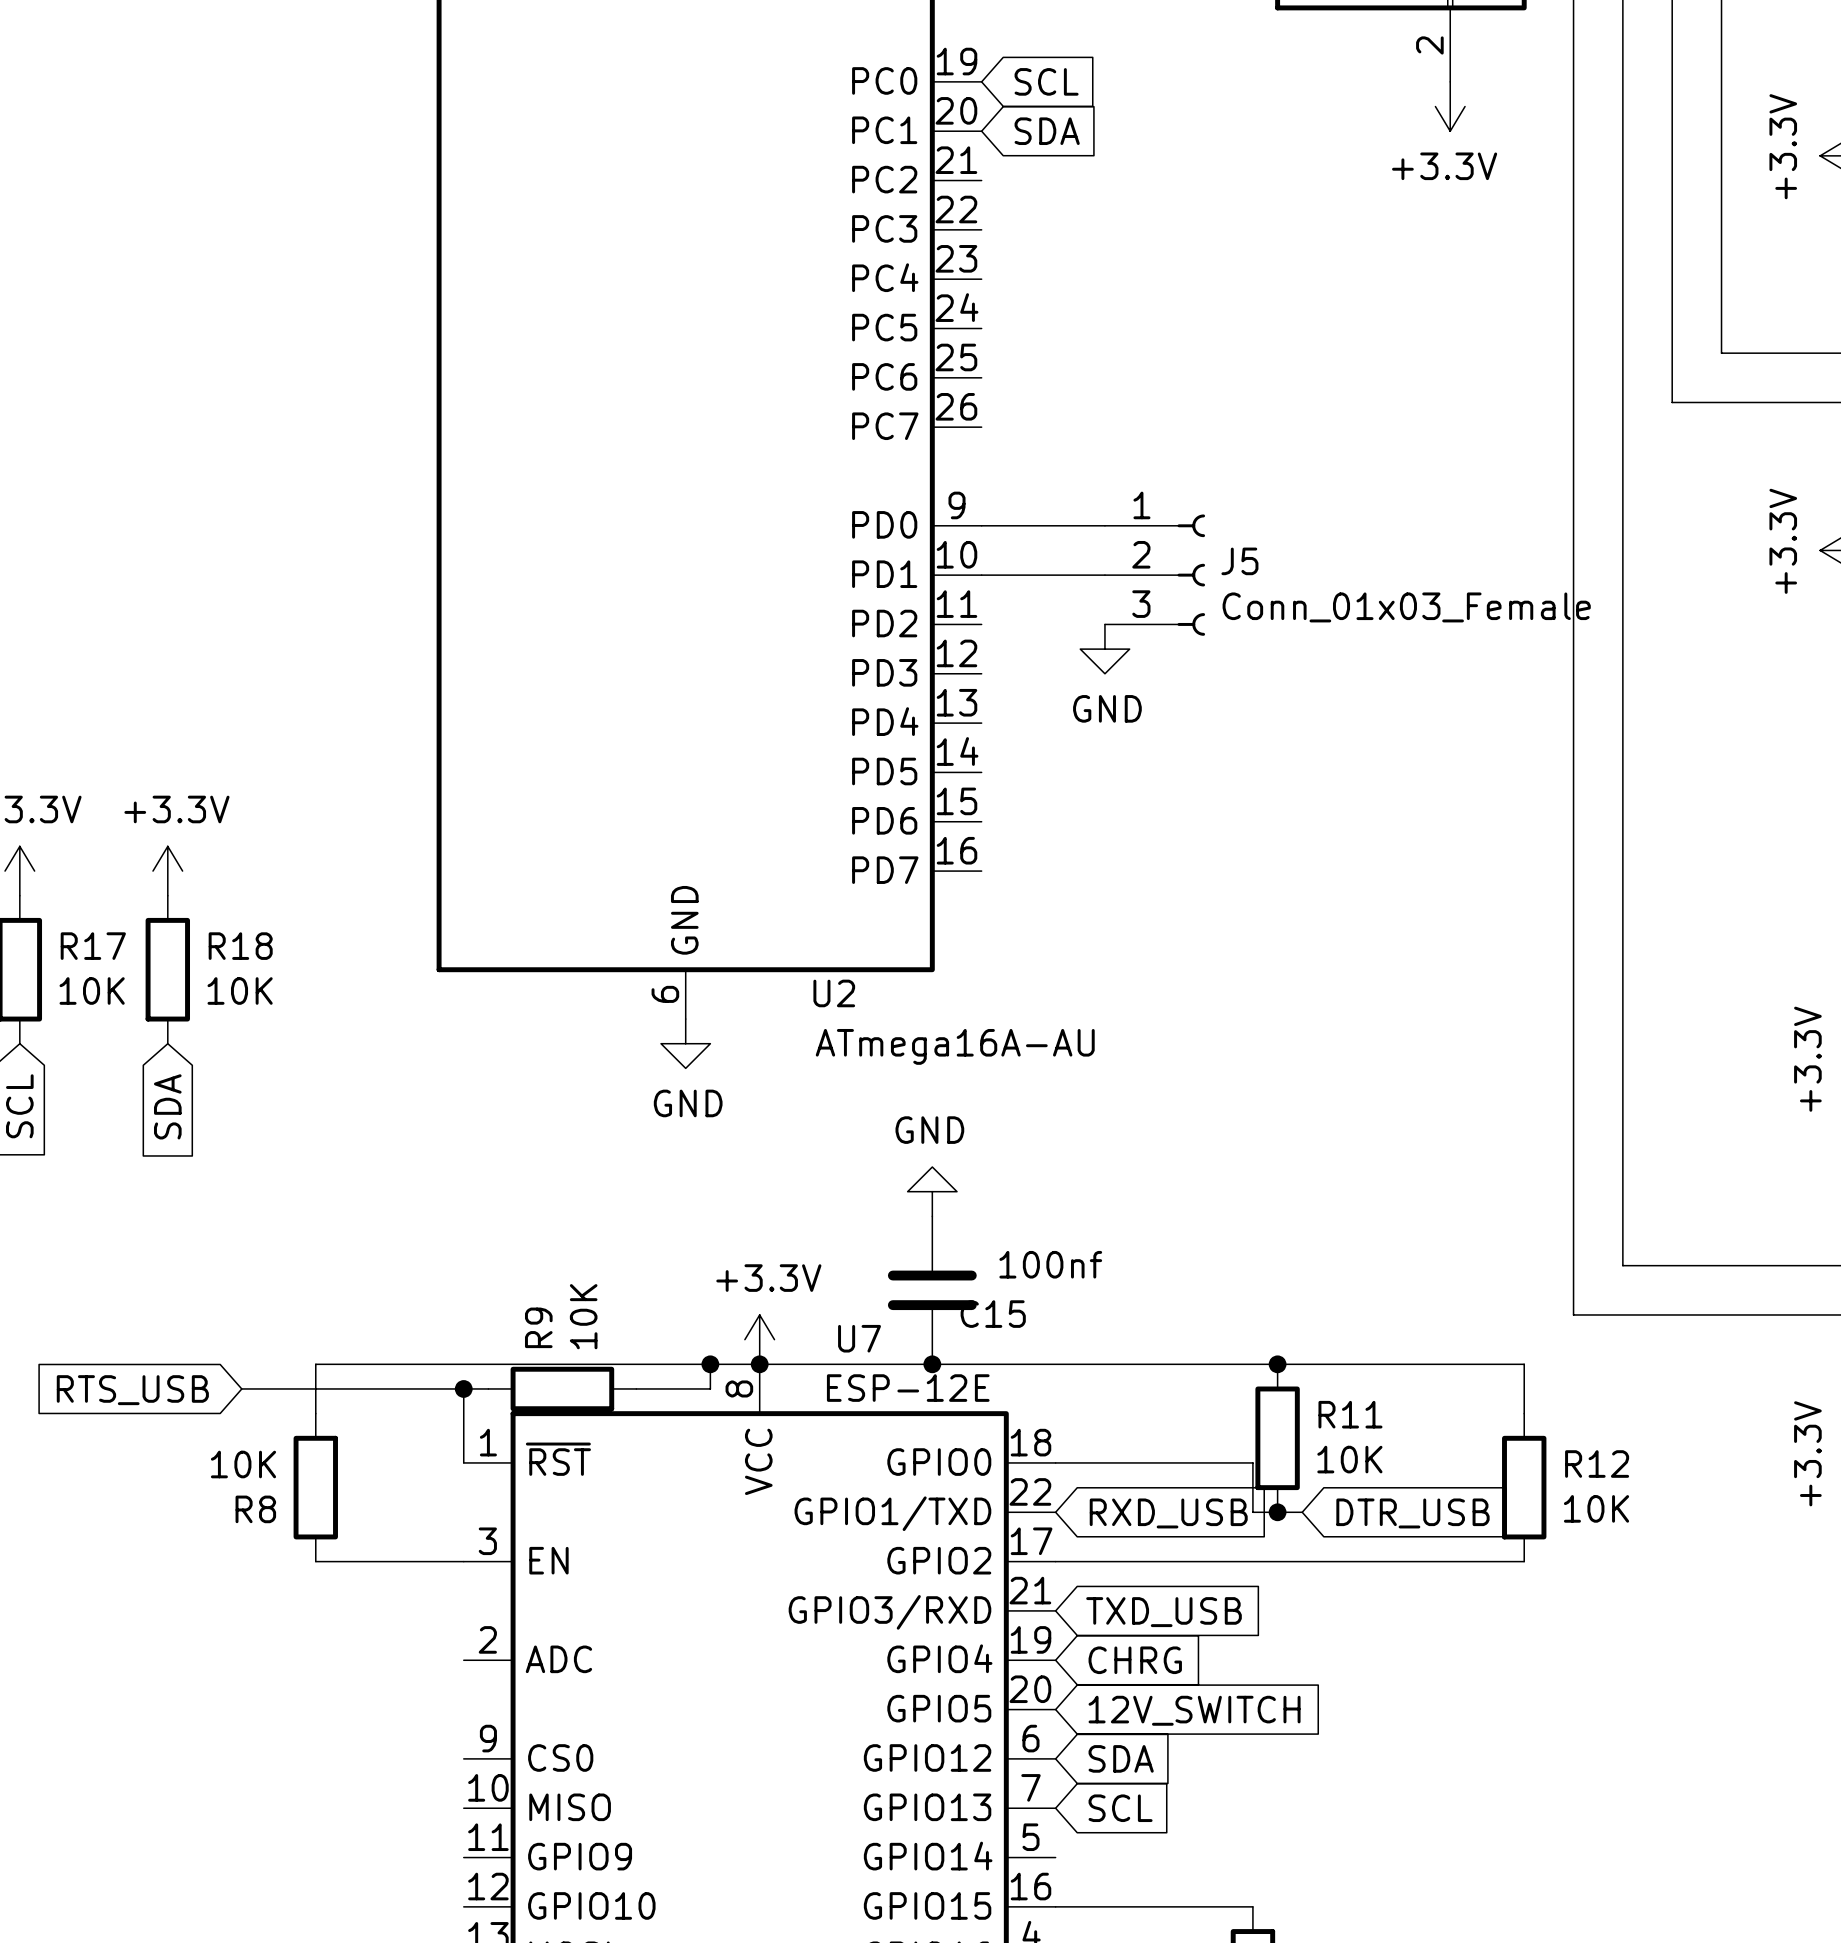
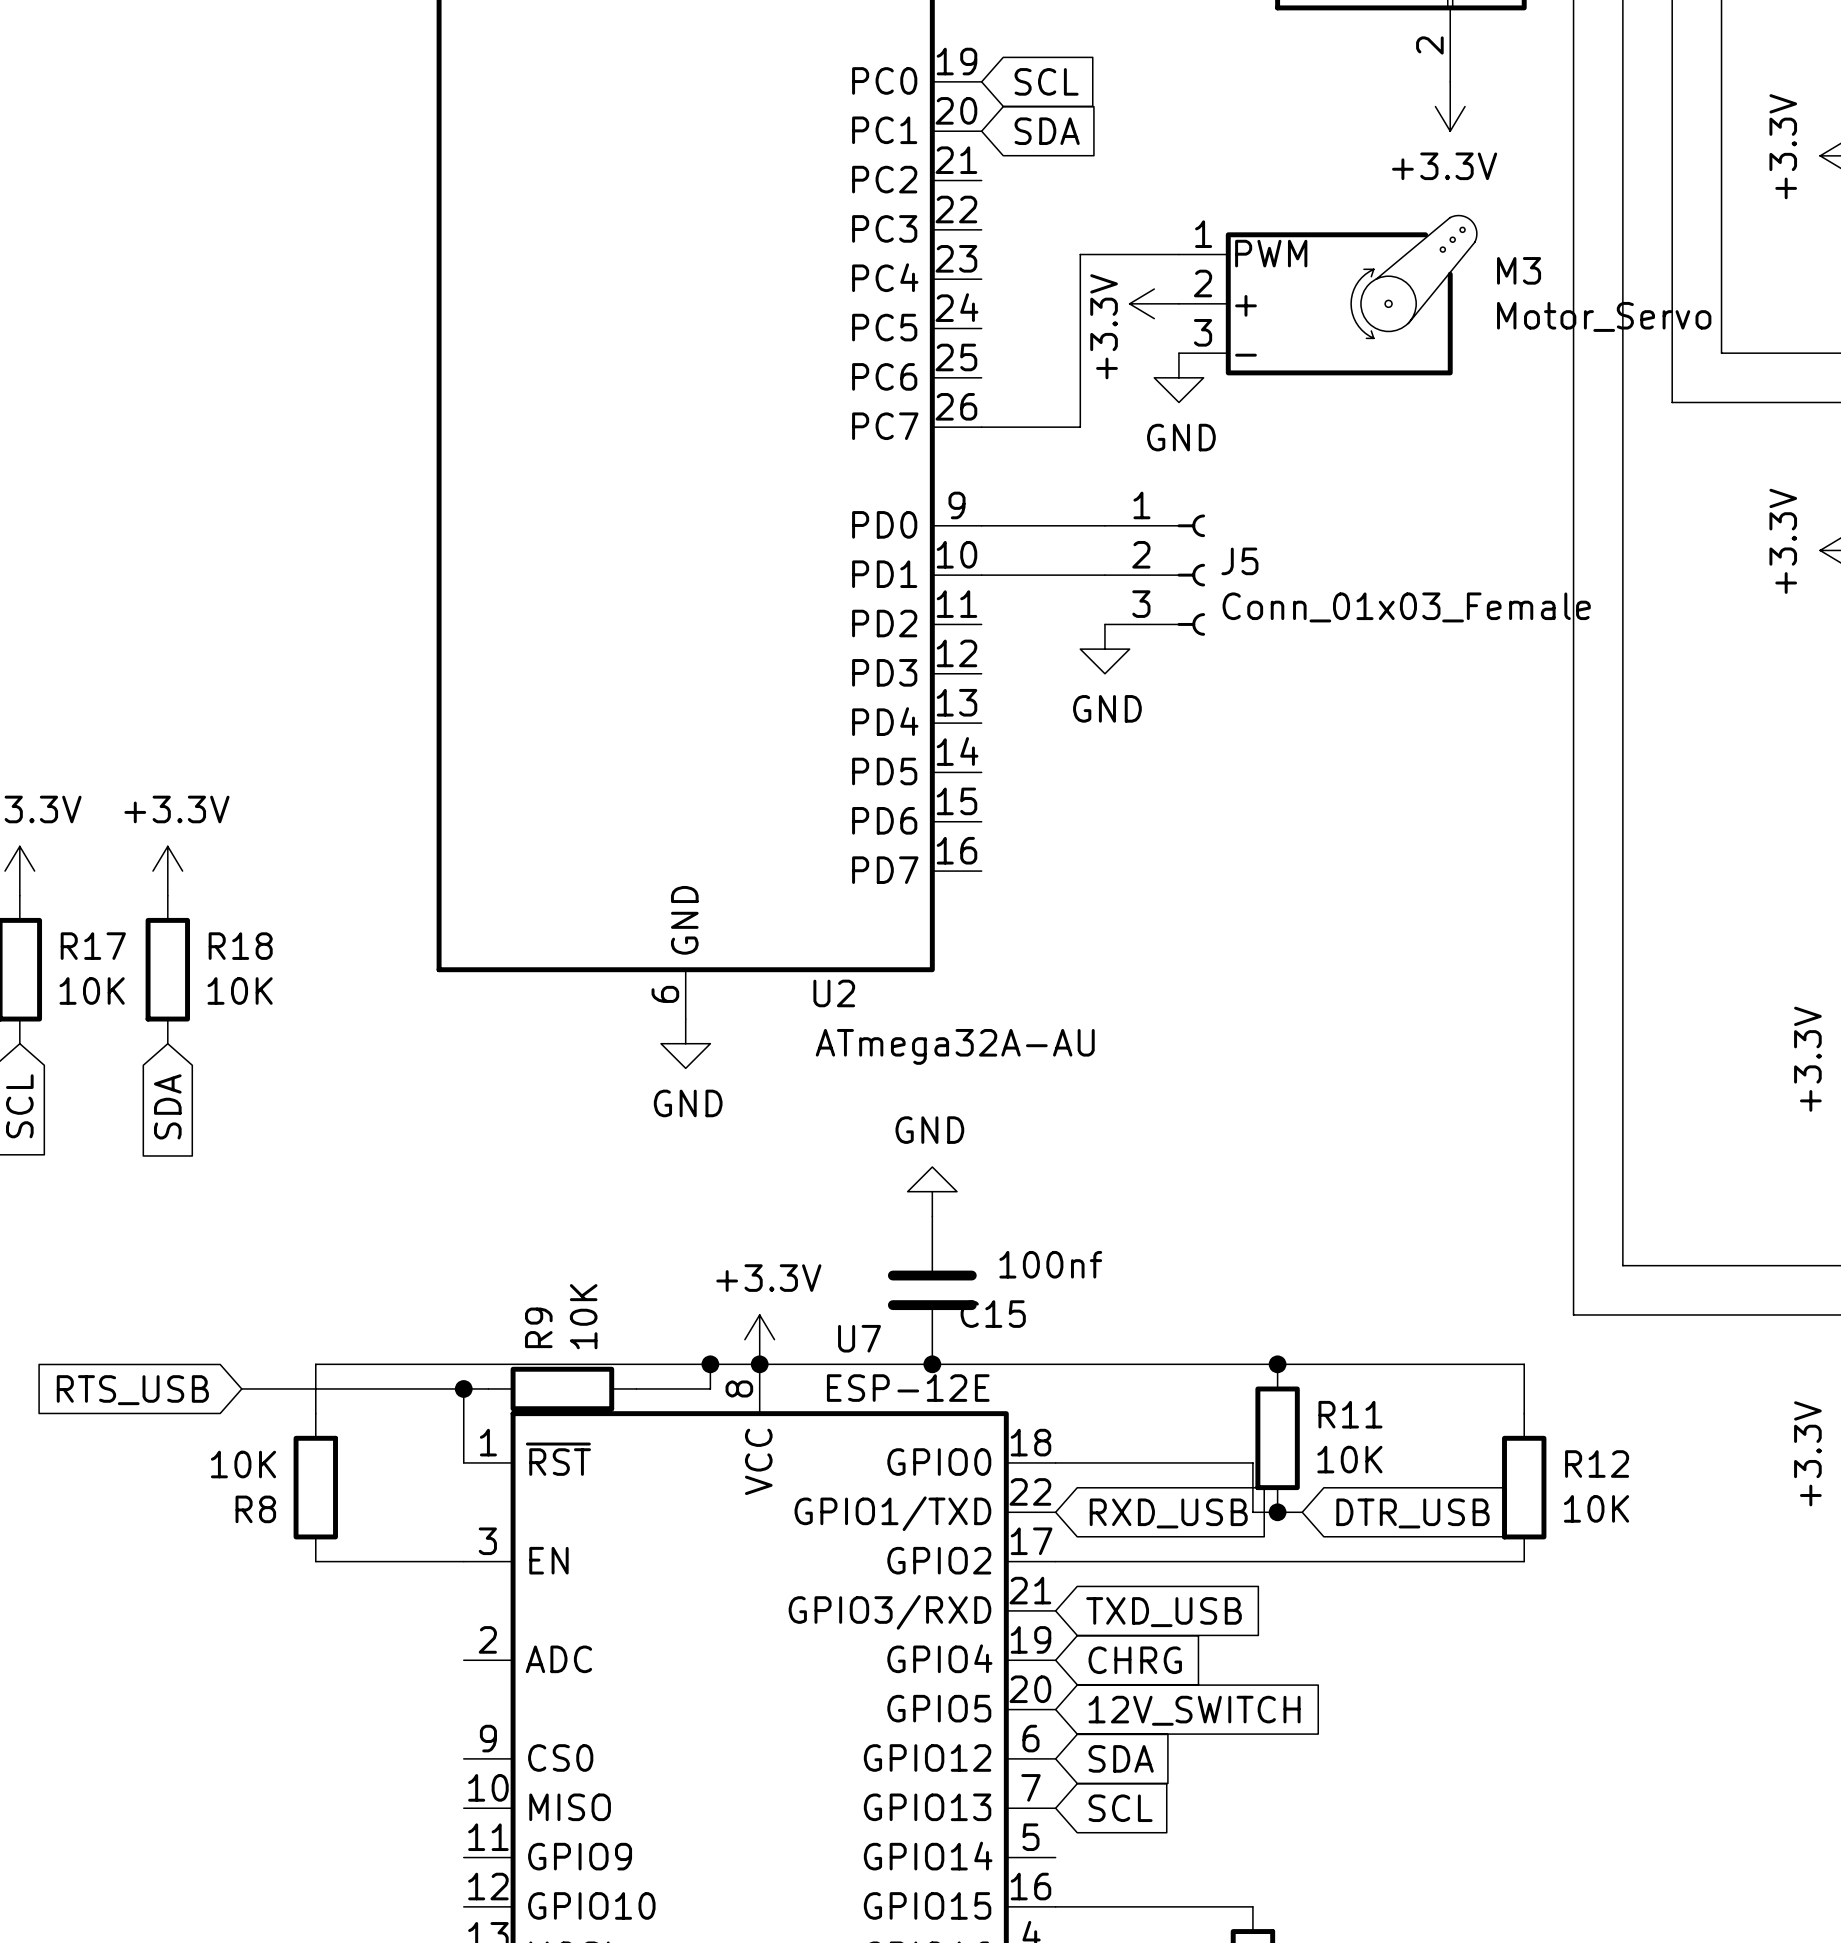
wire: none -> (1178, 254) (1080, 254) (1080, 427) (981, 427)
M3: none -> Motor_Servo (1327, 295)
power symbol: none -> +3.3V (1154, 303)
power symbol: none -> GND (1178, 377)
U2 value: ATmega16A-AU (955, 1046) -> ATmega32A-AU (955, 1046)

